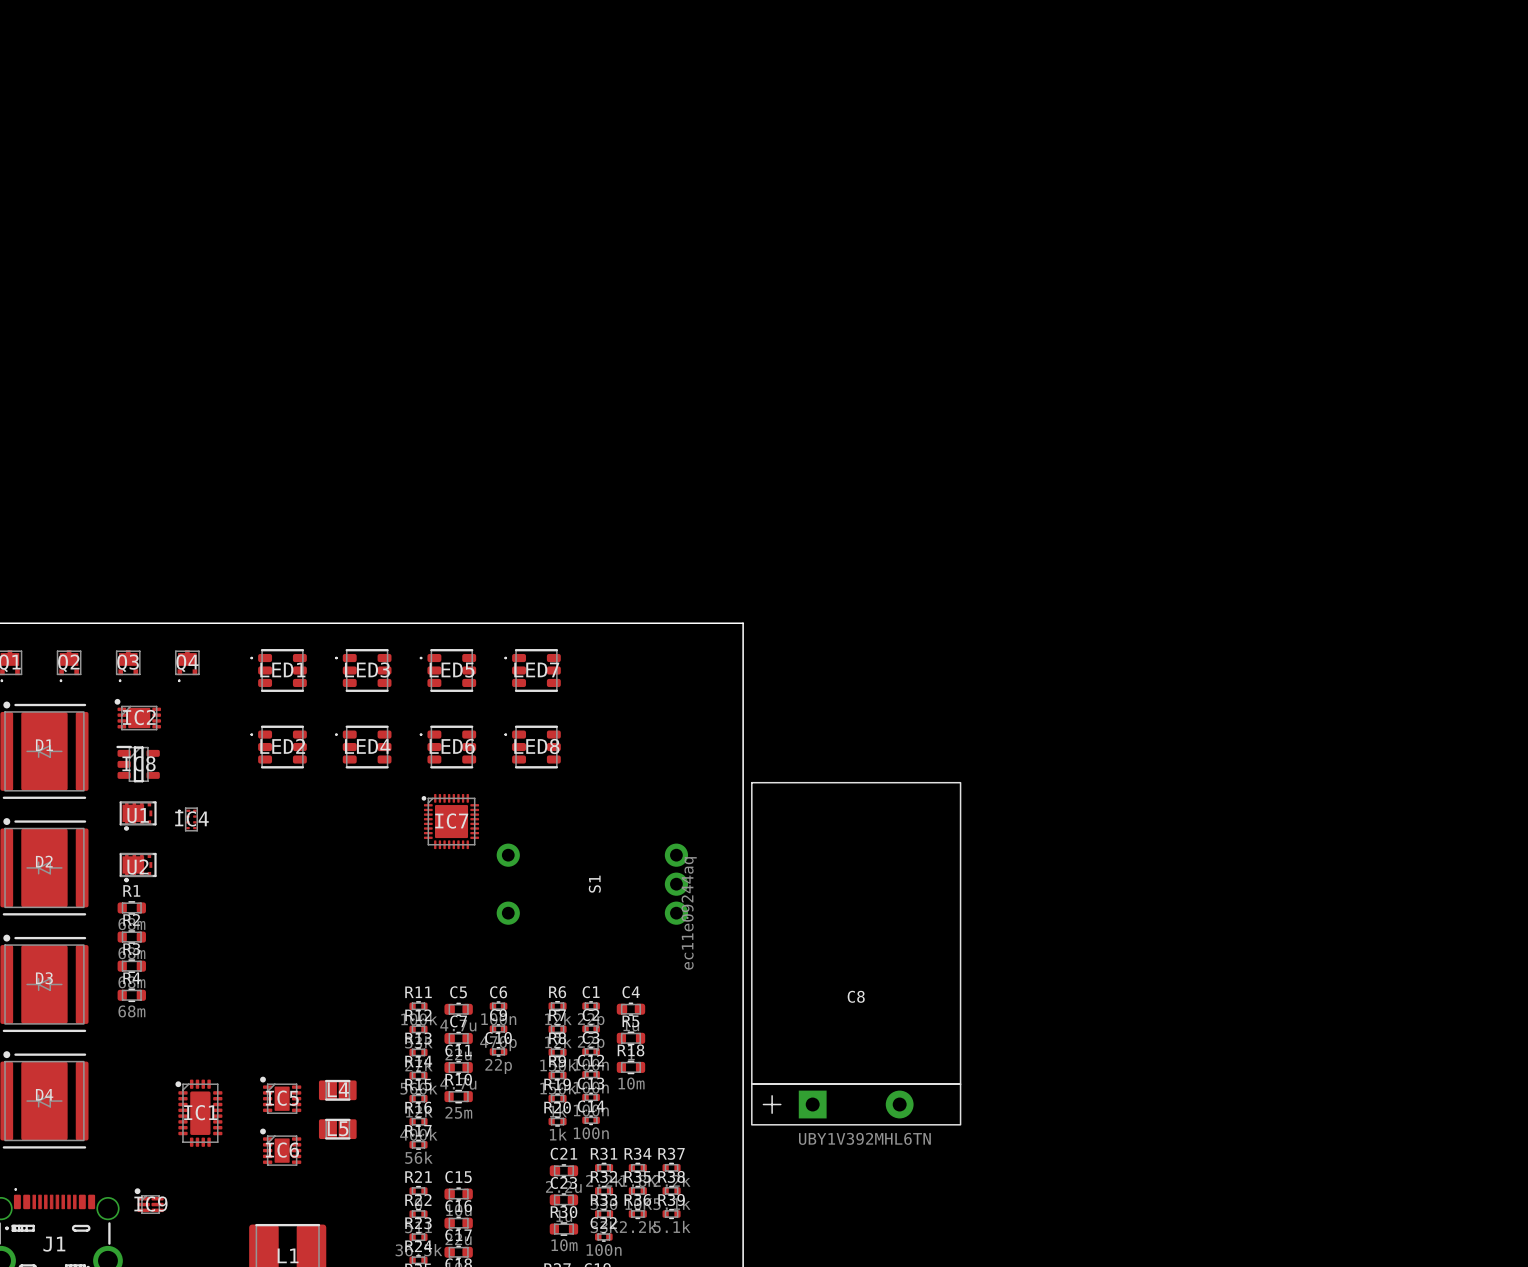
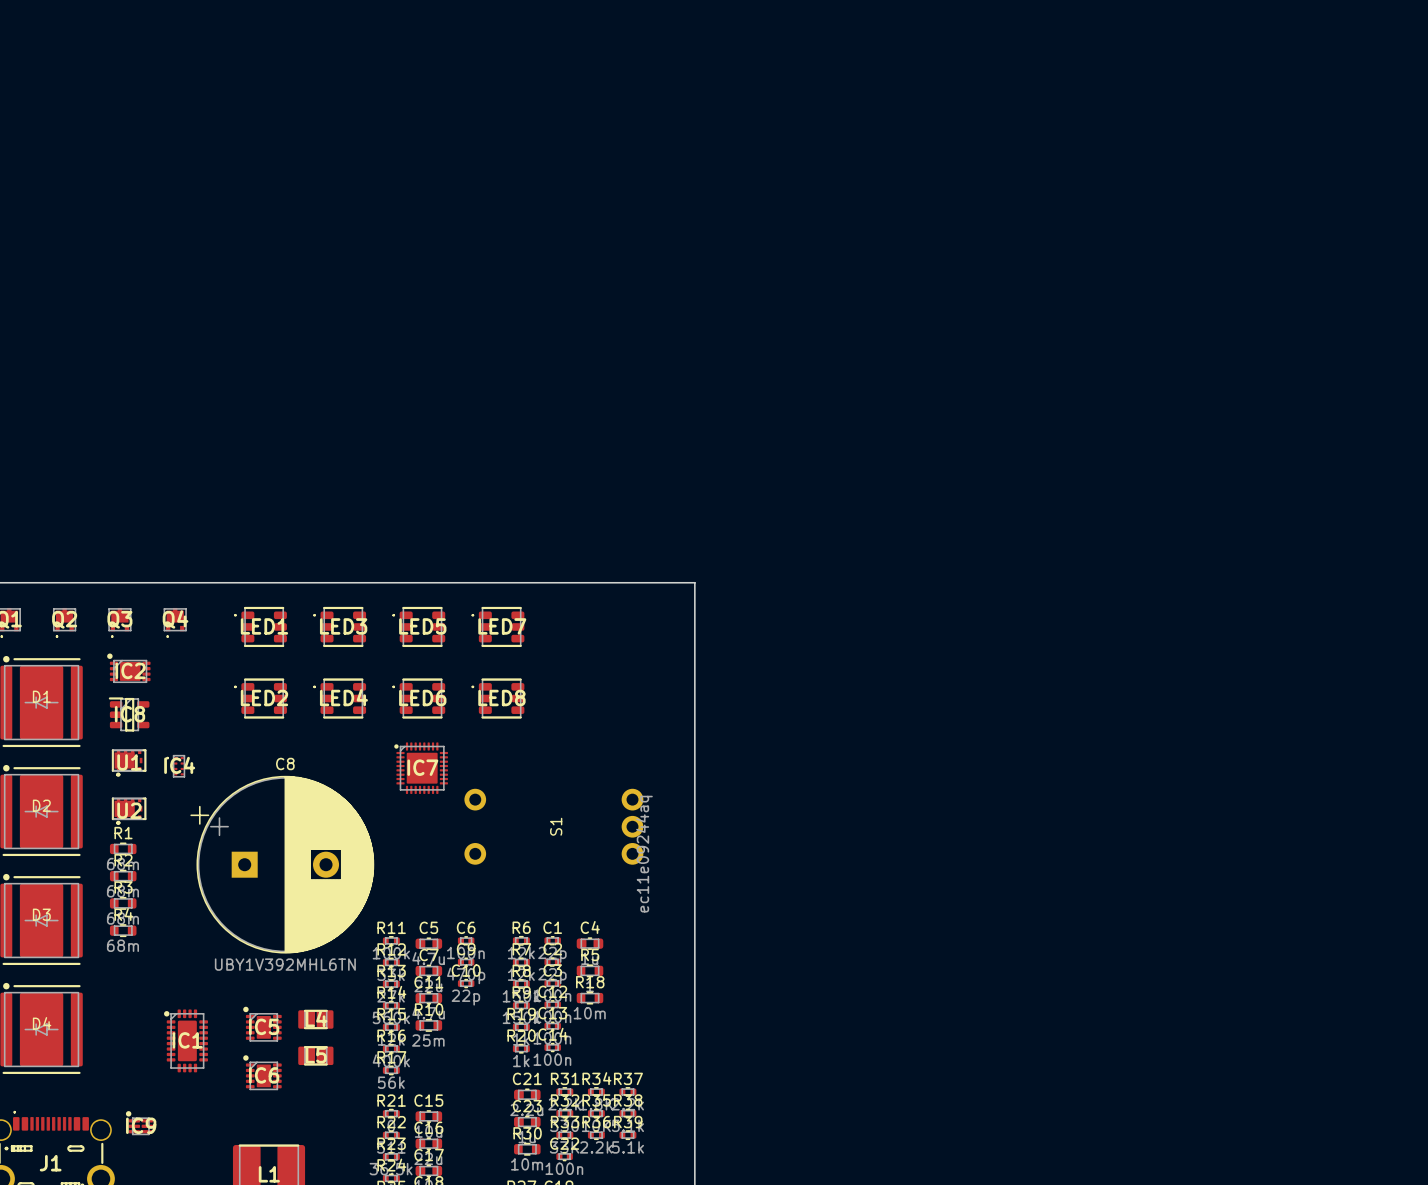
C8 footprint: [751, 782, 962, 1126] -> [190, 776, 375, 954]
C8 name position: C8 (856, 996) -> C8 (285, 763)
C8 value position: UBY1V392MHL6TN (864, 1138) -> UBY1V392MHL6TN (285, 964)

